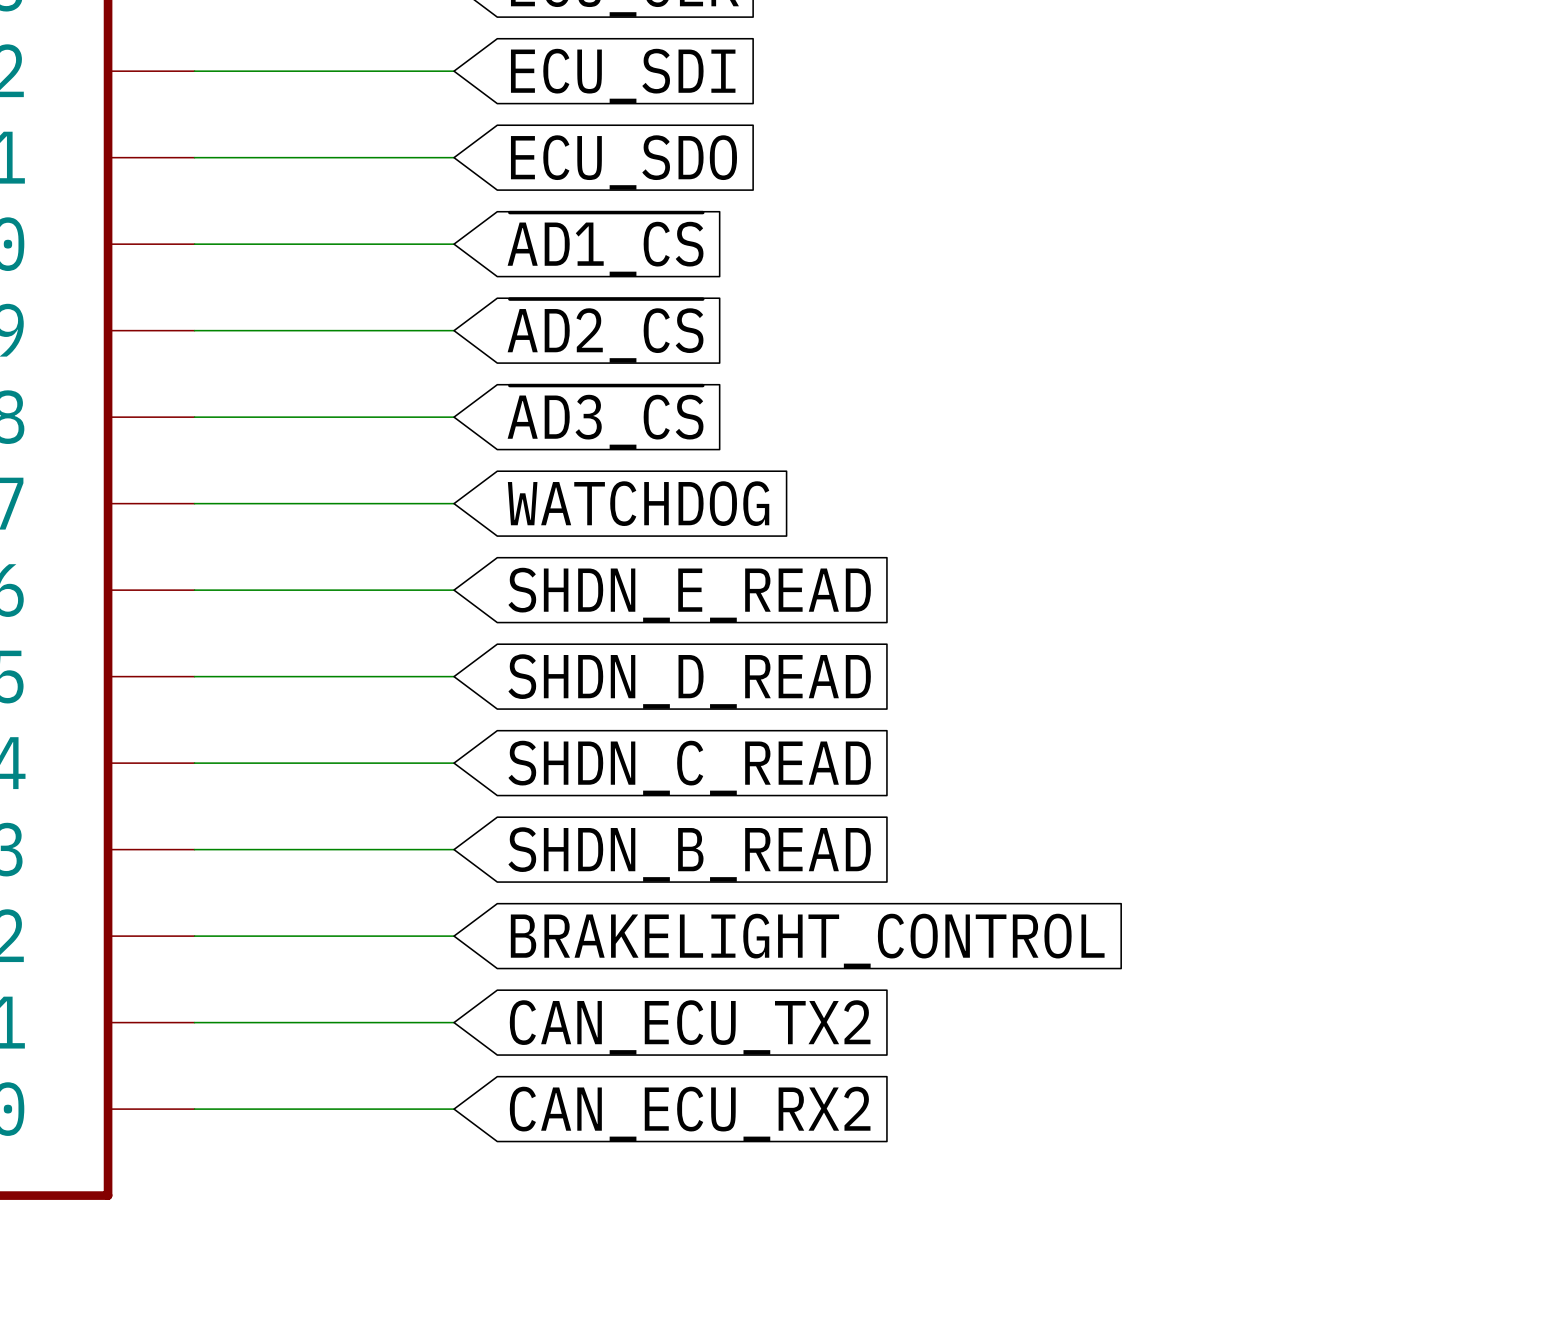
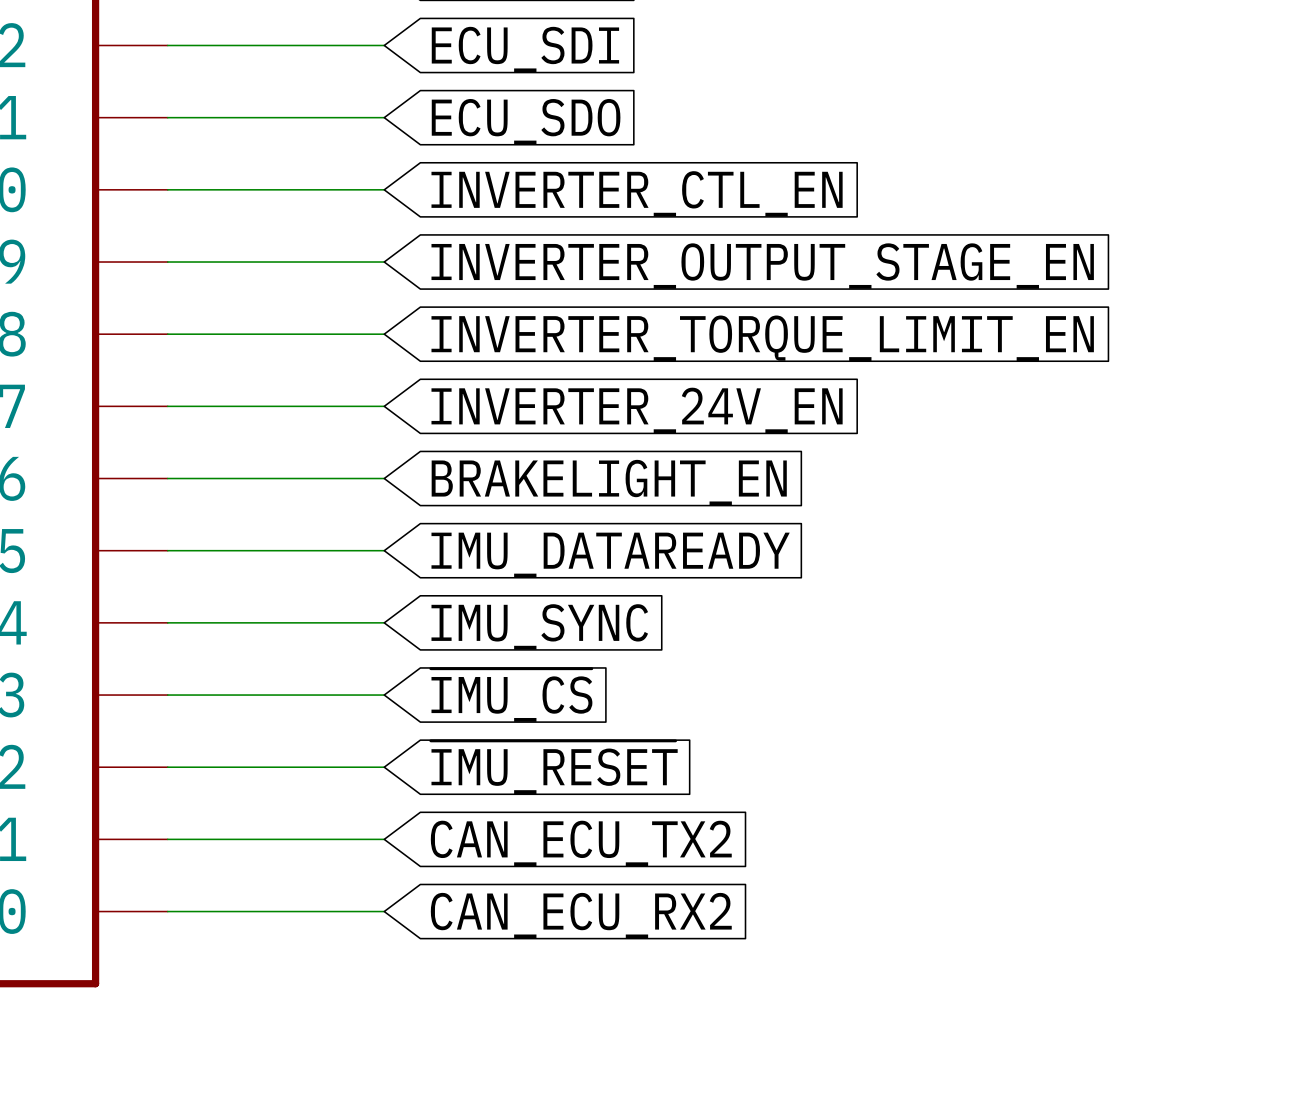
global label: ~{AD1_CS} (605, 244) -> INVERTER_CTL_EN (637, 193)
global label: ~{AD2_CS} (605, 330) -> INVERTER_OUTPUT_STAGE_EN (762, 266)
global label: ~{AD3_CS} (605, 417) -> INVERTER_TORQUE_LIMIT_EN (762, 338)
global label: WATCHDOG (638, 503) -> INVERTER_24V_EN (637, 410)
global label: SHDN_E_READ (689, 595) -> BRAKELIGHT_EN (609, 482)
global label: SHDN_D_READ (689, 681) -> IMU_DATAREADY (610, 555)
global label: SHDN_C_READ (689, 767) -> IMU_SYNC (539, 626)
global label: SHDN_B_READ (689, 854) -> ~{IMU_CS} (511, 695)
global label: BRAKELIGHT_CONTROL (807, 940) -> ~{IMU_RESET} (554, 767)

